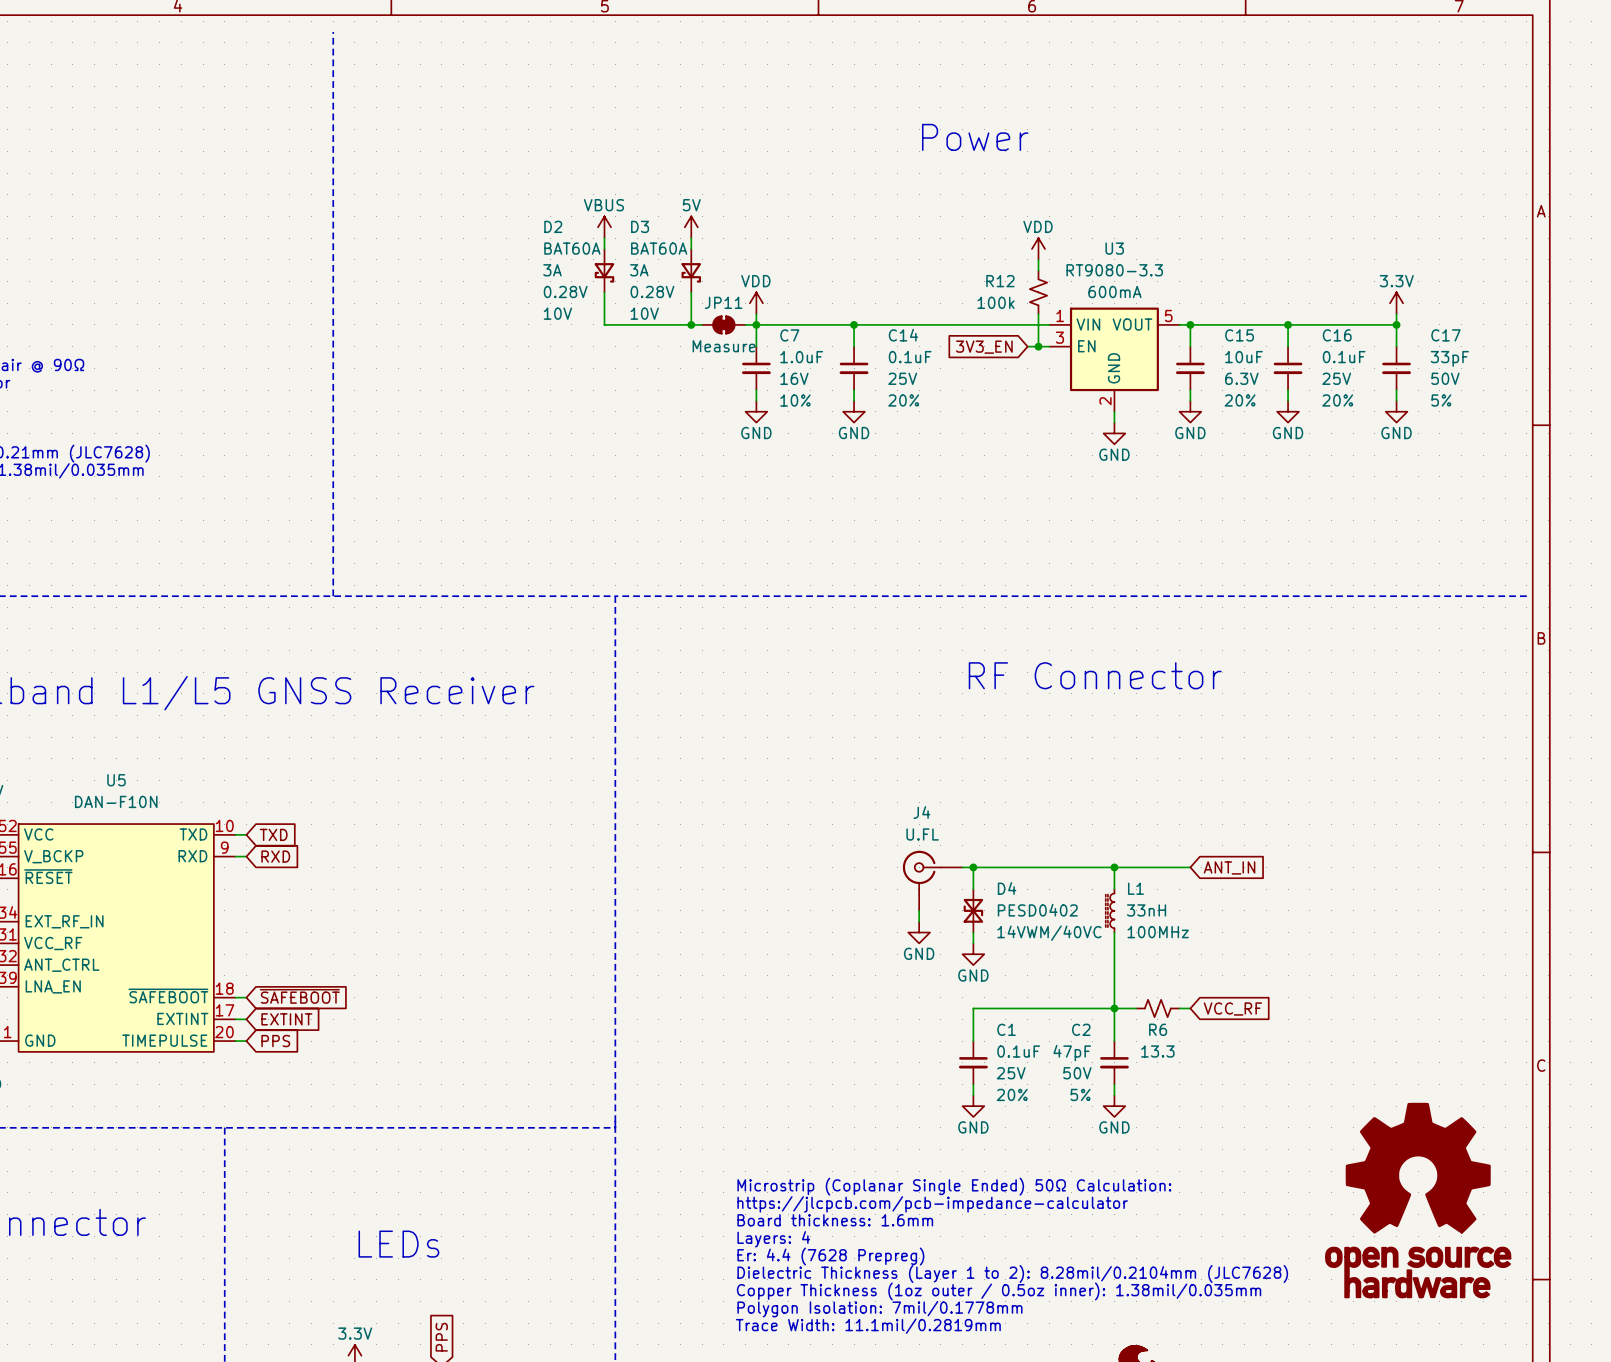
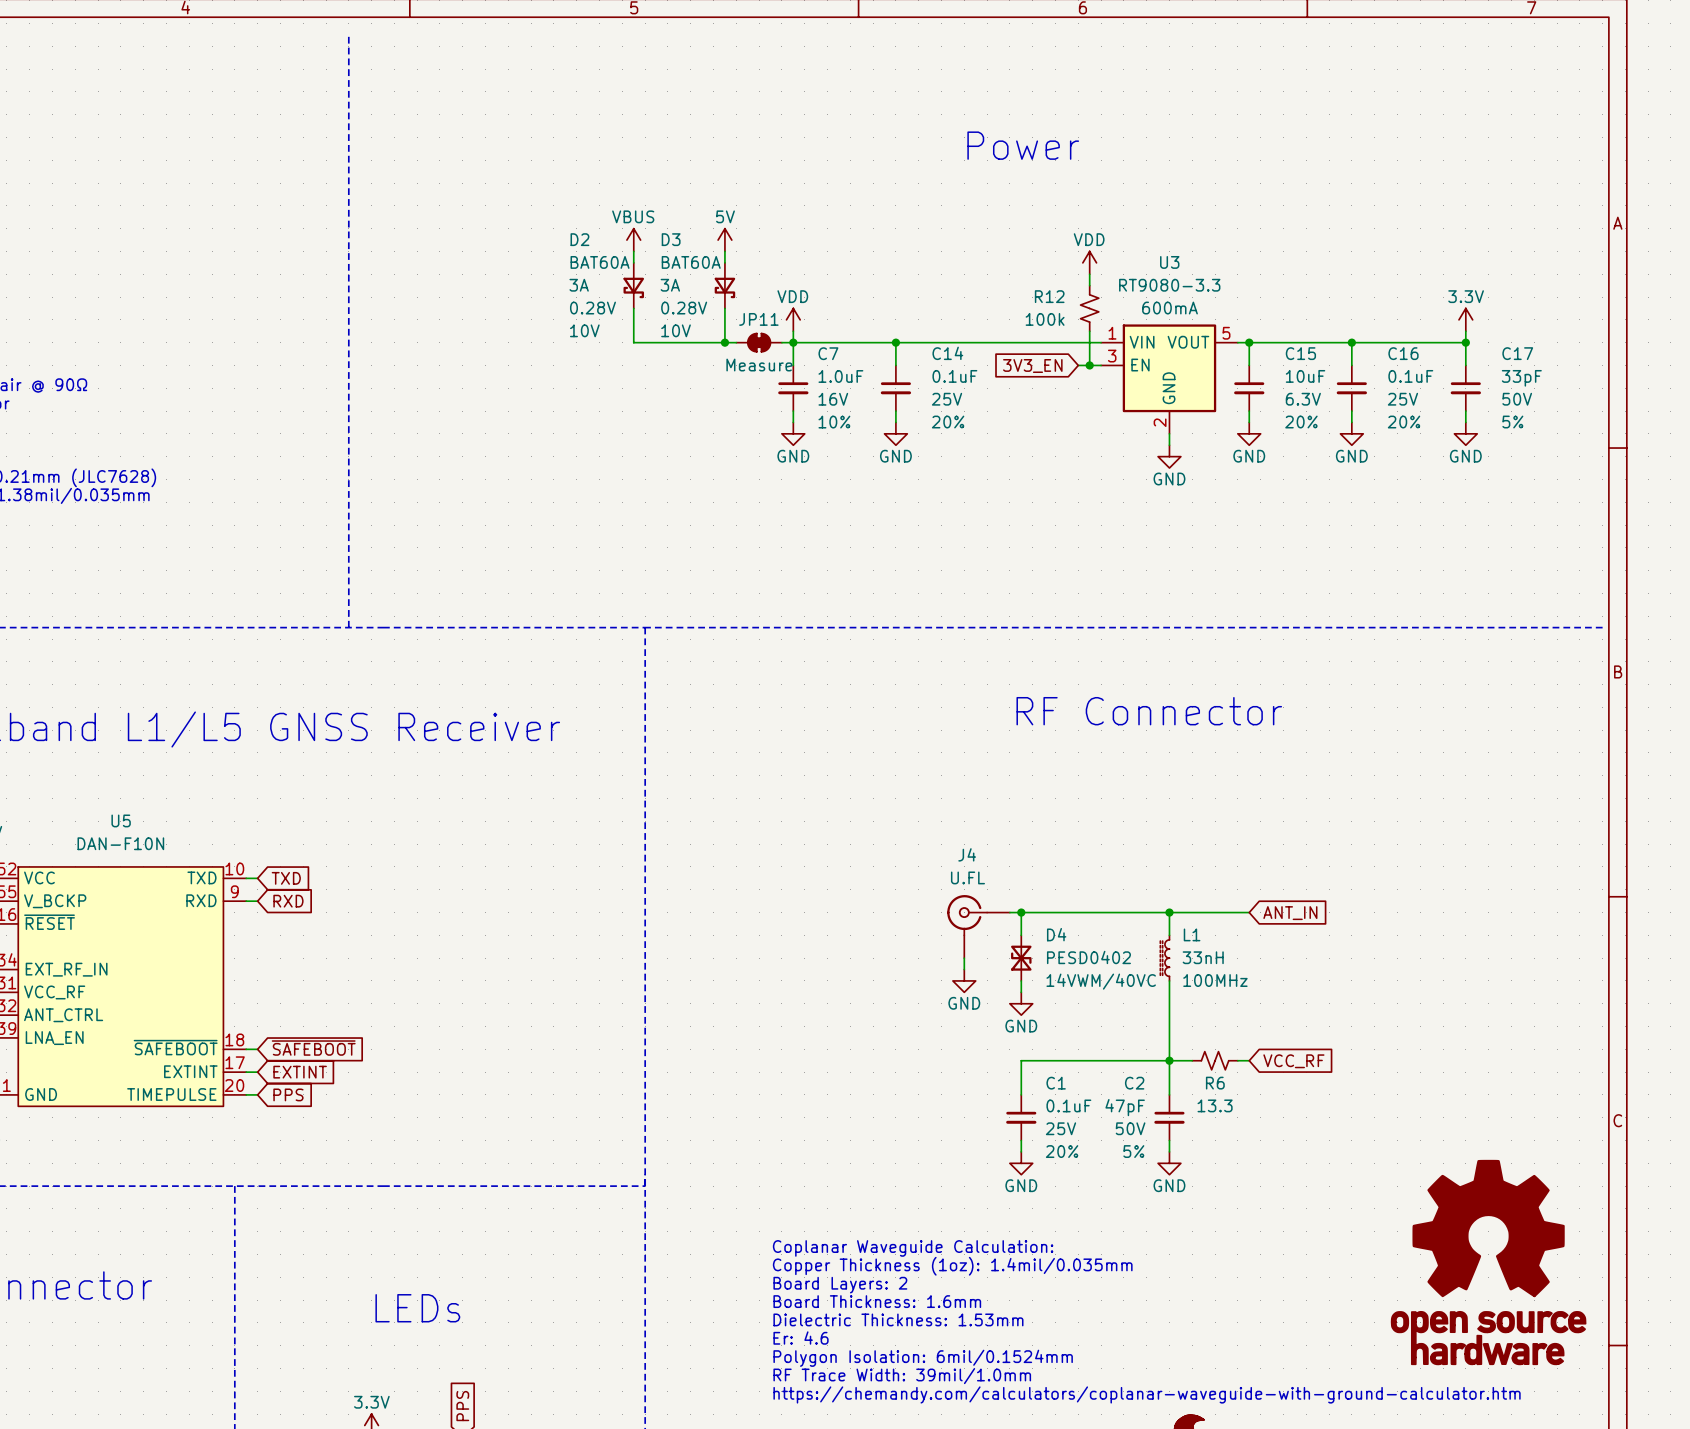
text: Microstrip (Coplanar Single Ended) 50Ω Calculation: (954, 1186) -> Coplanar Waveguide Calculation: (913, 1248)
text: https://jlcpcb.com/pcb-impedance-calculator (932, 1204) -> Copper Thickness (1oz): 1.4mil/0.035mm (952, 1266)
text: Board thickness: 1.6mm (835, 1220) -> Board Layers: 2 (840, 1285)
text: Layers: 4 (773, 1239) -> Board Thickness: 1.6mm (877, 1301)
text: Er: 4.4 (7628 Prepreg) (830, 1256) -> Dielectric Thickness: 1.53mm (898, 1319)
text: Dielectric Thickness (Layer 1 to 2): 8.28mil/0.2104mm (JLC7628) (1012, 1273) -> Er: 4.6 (801, 1338)
text: Copper Thickness (1oz outer / 0.5oz inner): 1.38mil/0.035mm (999, 1291) -> Polygon Isolation: 6mil/0.1524mm (923, 1358)
text: Polygon Isolation: 7mil/0.1778mm (879, 1309) -> RF Trace Width: 39mil/1.0mm (902, 1376)
text: Trace Width: 11.1mil/0.2819mm (868, 1326) -> https://chemandy.com/calculators/coplanar-waveguide-with-ground-calculator.htm (1147, 1394)

